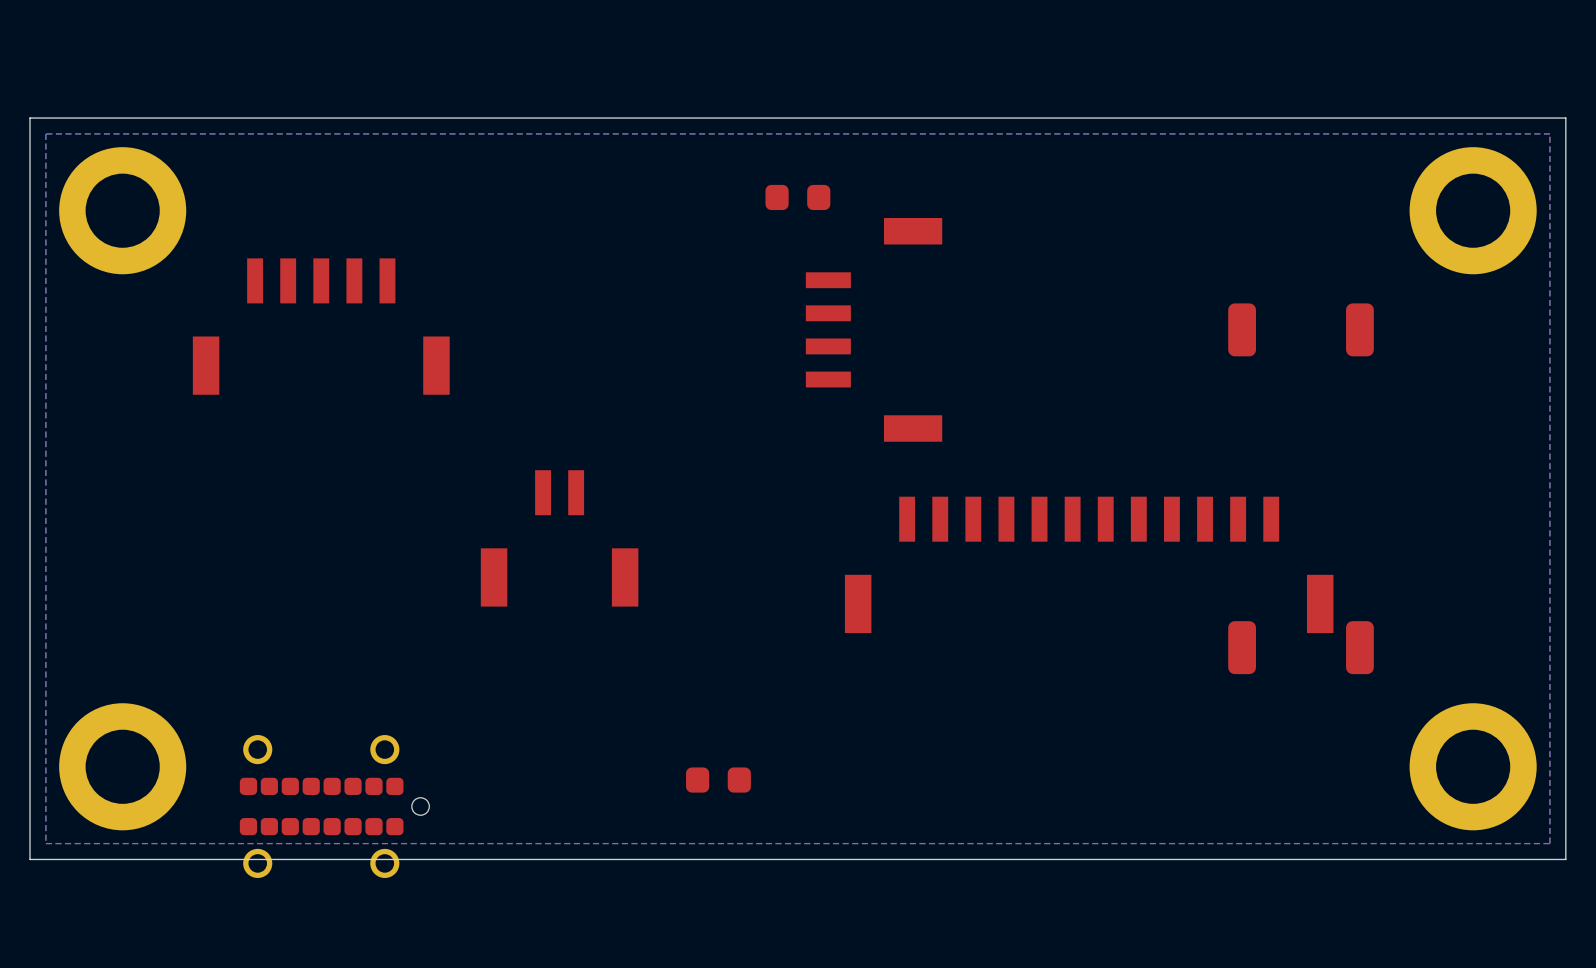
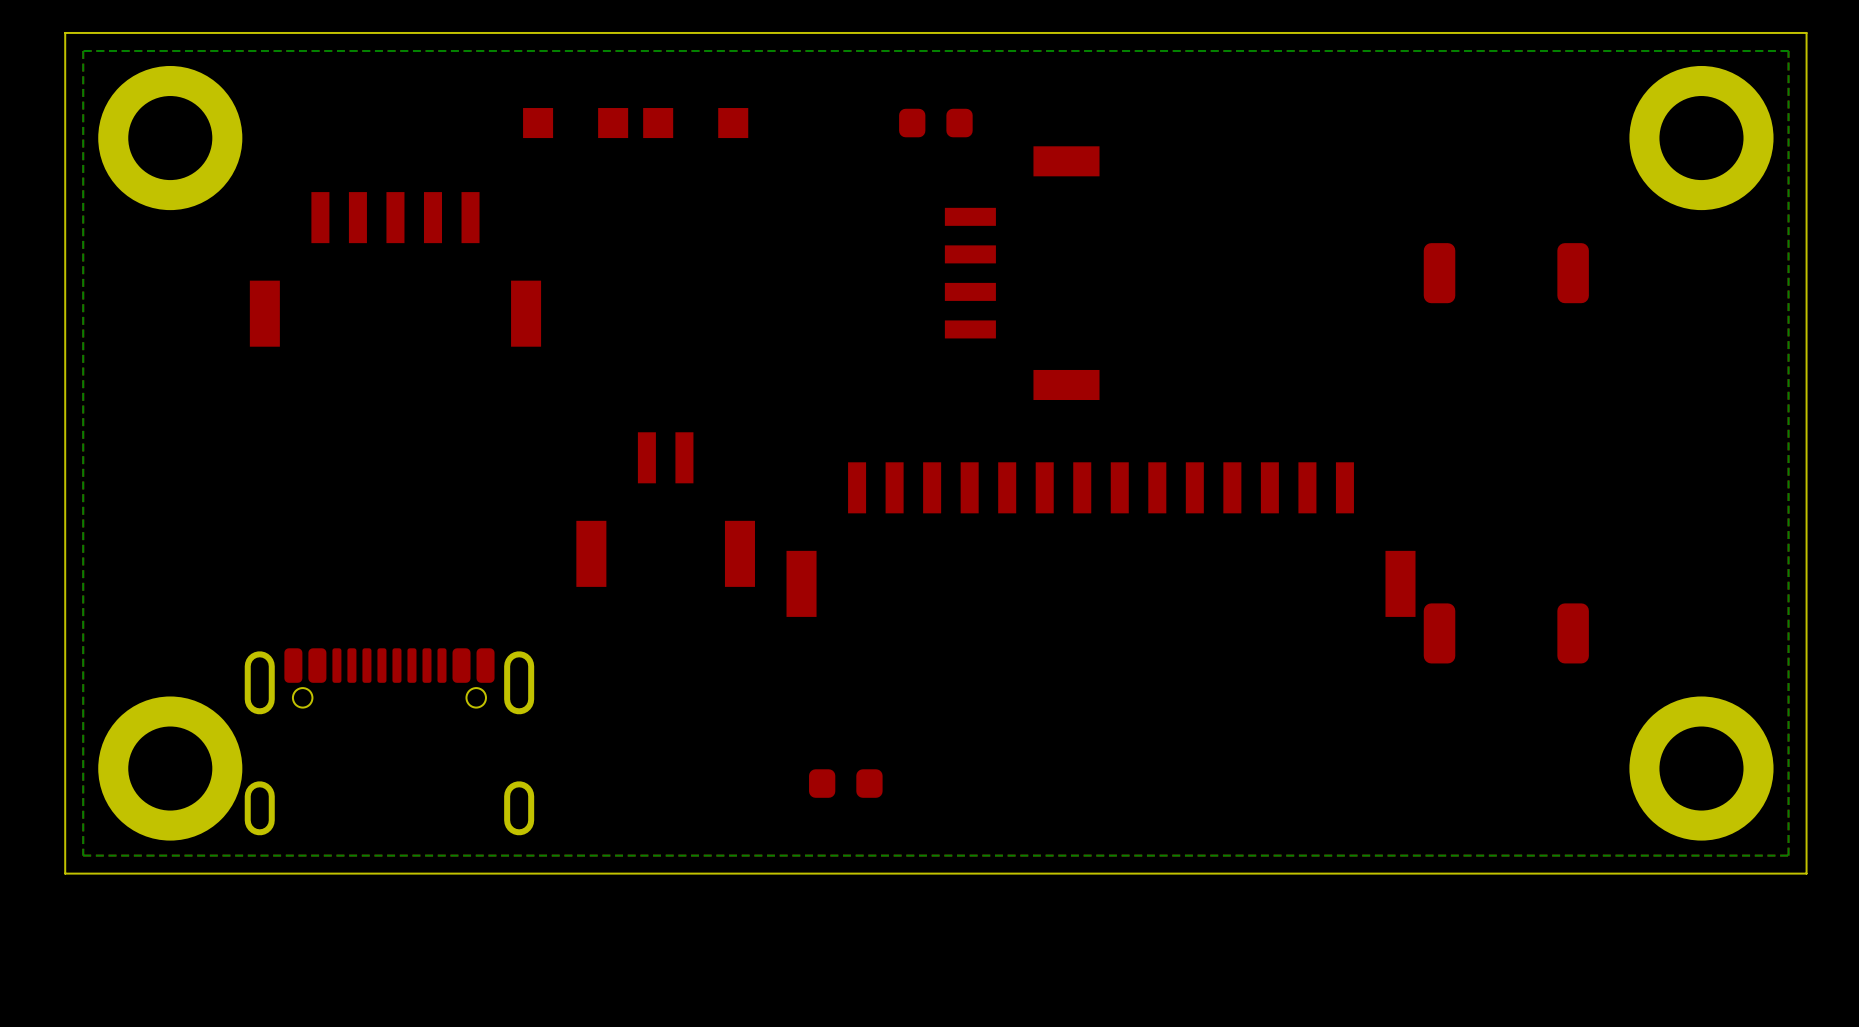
part: none -> (575, 123)
part: none -> (695, 123)
part: none -> (1101, 539)
part: (1089, 564) -> none
part: none -> (389, 741)
part: (319, 806) -> none

